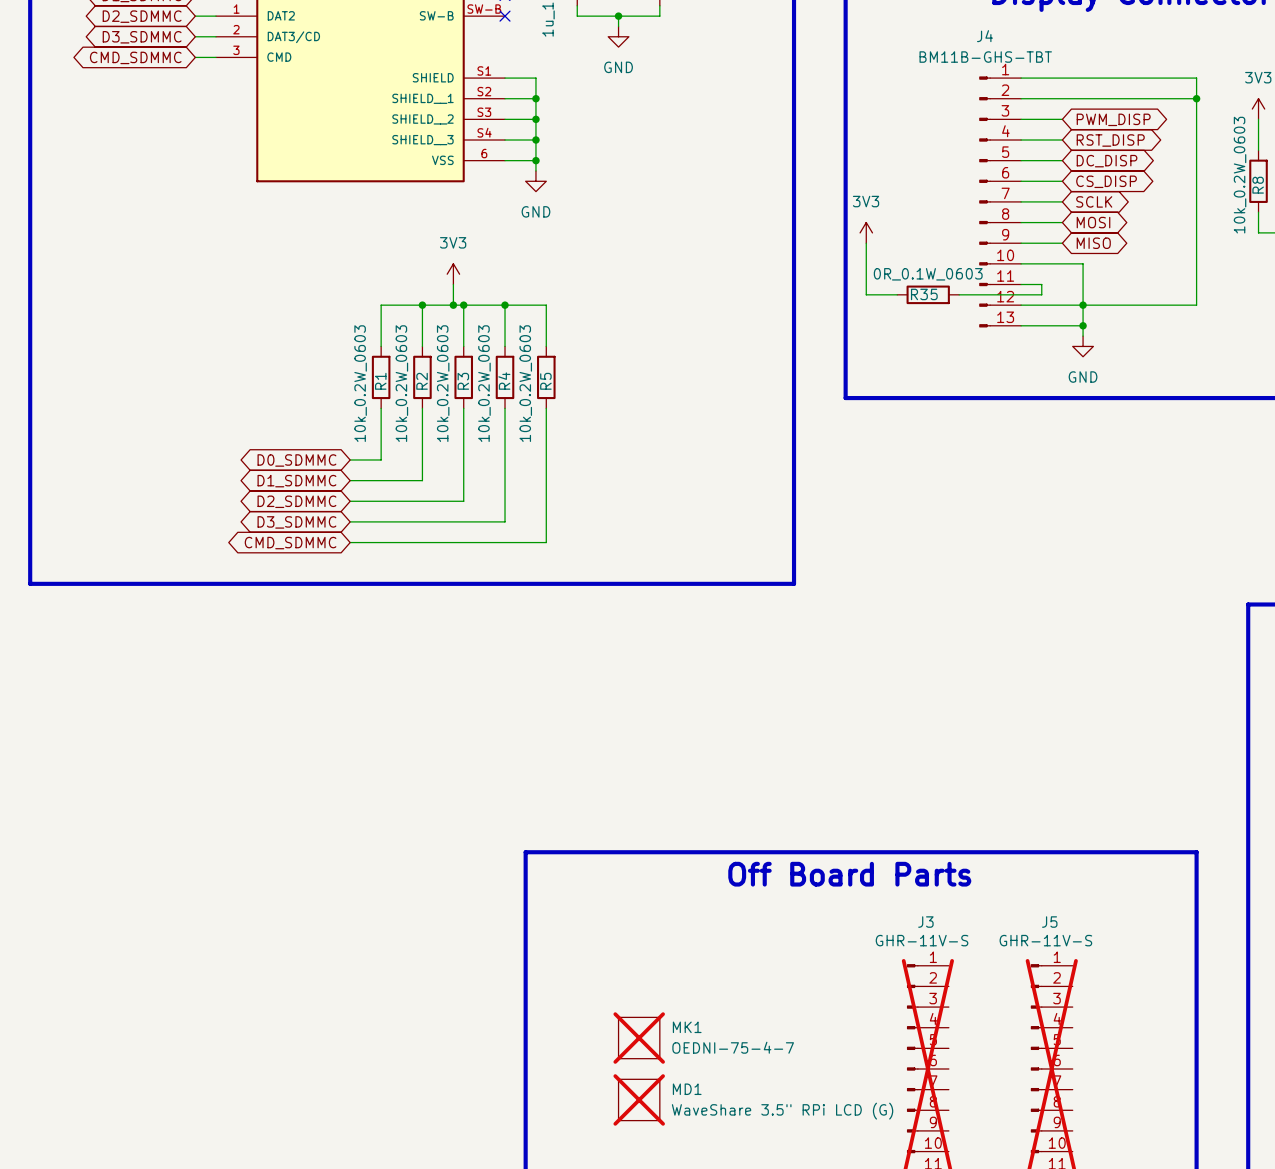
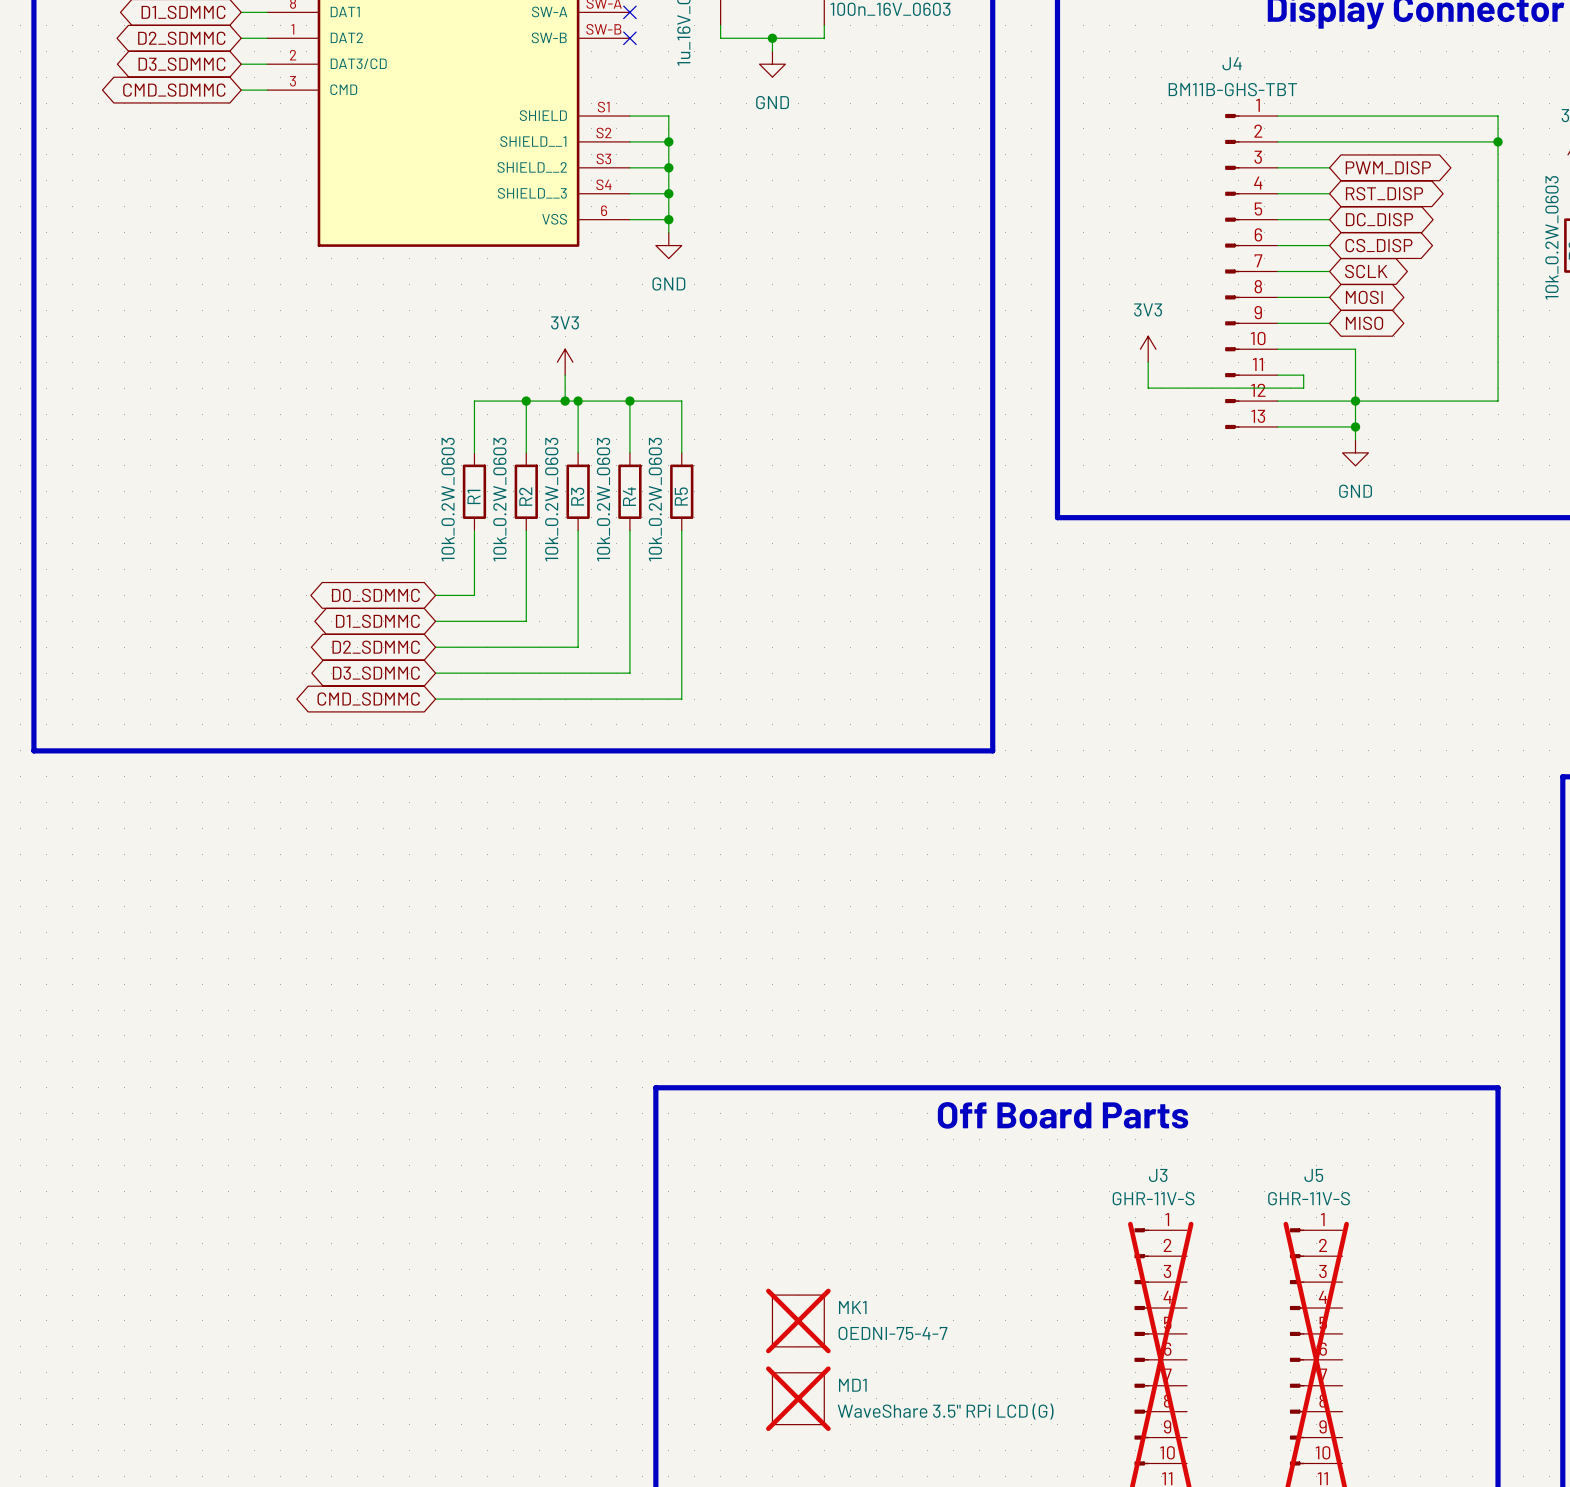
power symbol position: 3V3 (866, 232) -> 3V3 (1148, 349)
wire: (866, 243) (866, 294) (897, 294) -> none
wire: none -> (1148, 362) (1148, 388) (1200, 388)
R35: 0R_0.1W_0603 (928, 294) -> none

